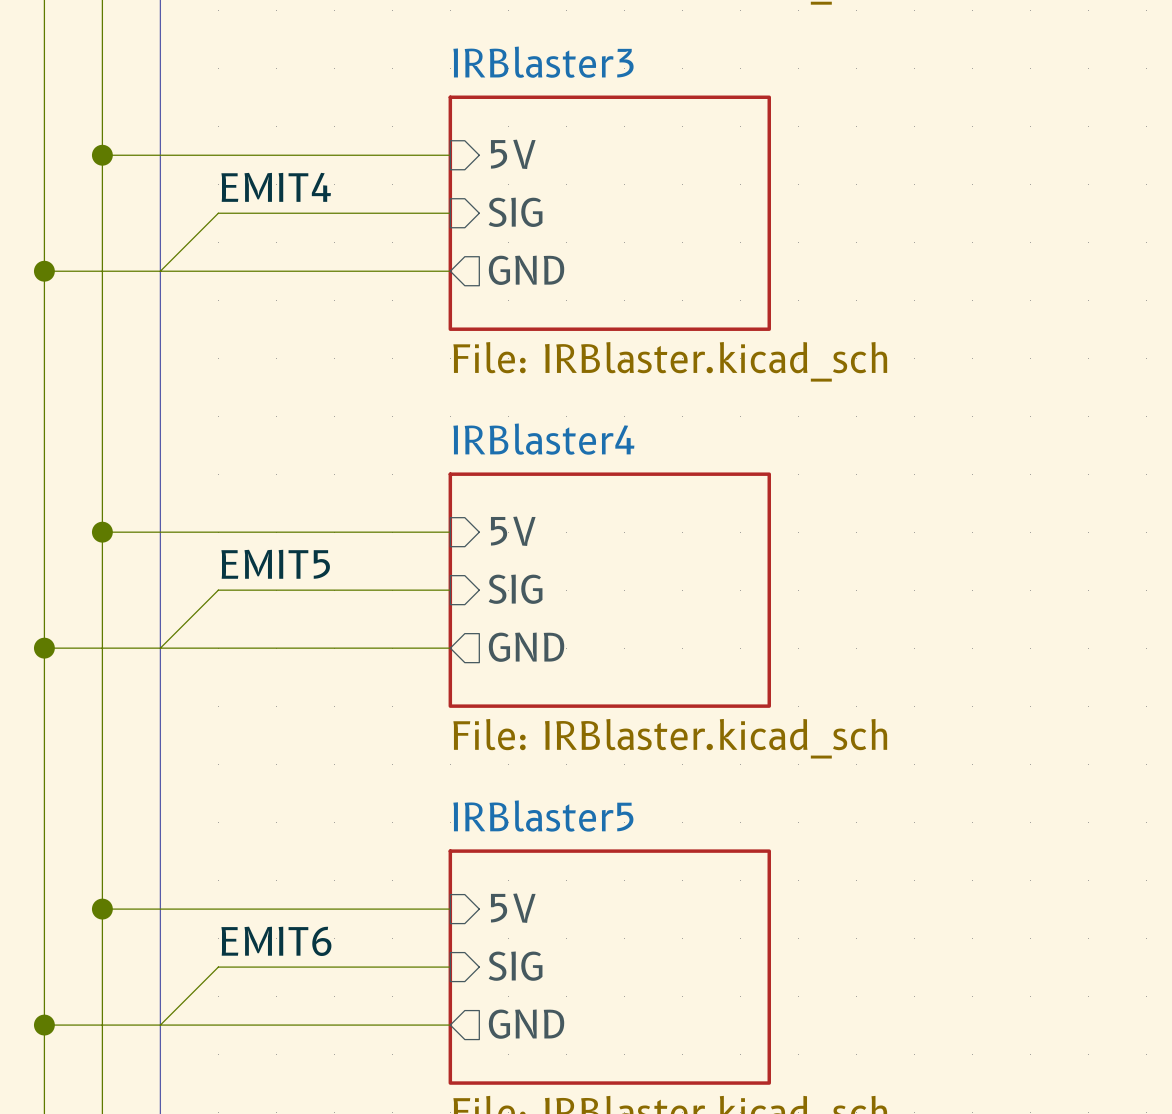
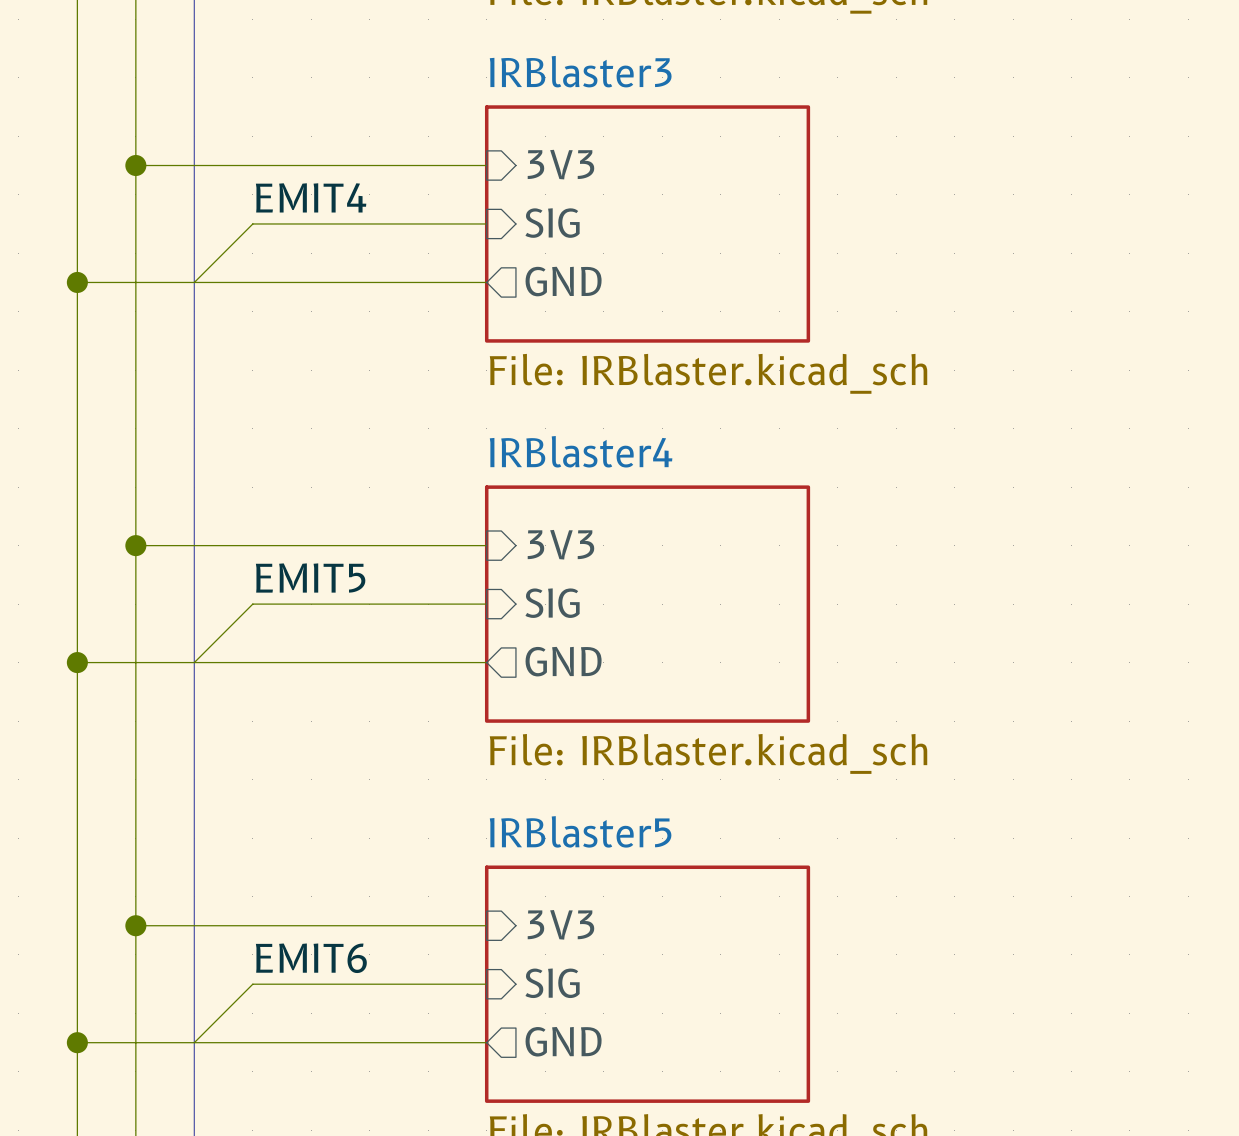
sheet pin: 5V (513, 154) -> 3V3 (560, 164)
sheet pin: 5V (513, 531) -> 3V3 (560, 544)
sheet pin: 5V (513, 908) -> 3V3 (560, 924)

